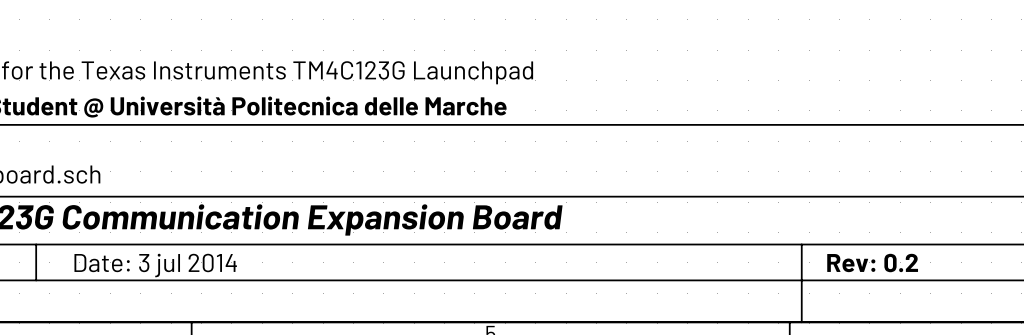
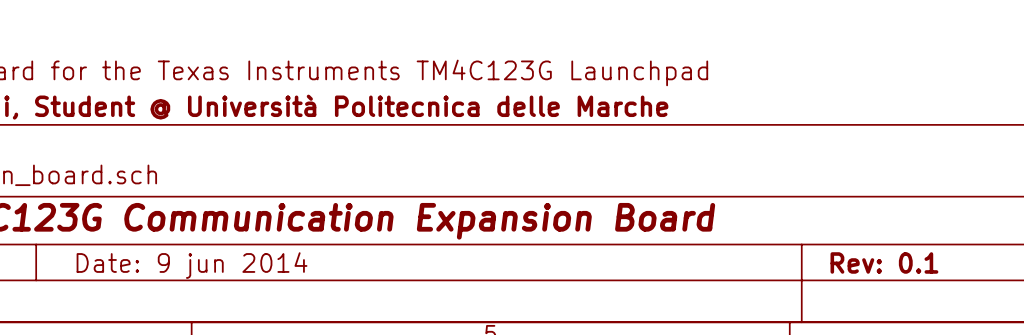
title block: Rev: 0.2 (872, 263) -> Rev: 0.1 (884, 262)
title block: Date: 3 jul 2014 (155, 265) -> Date: 9 jun 2014 (192, 265)

